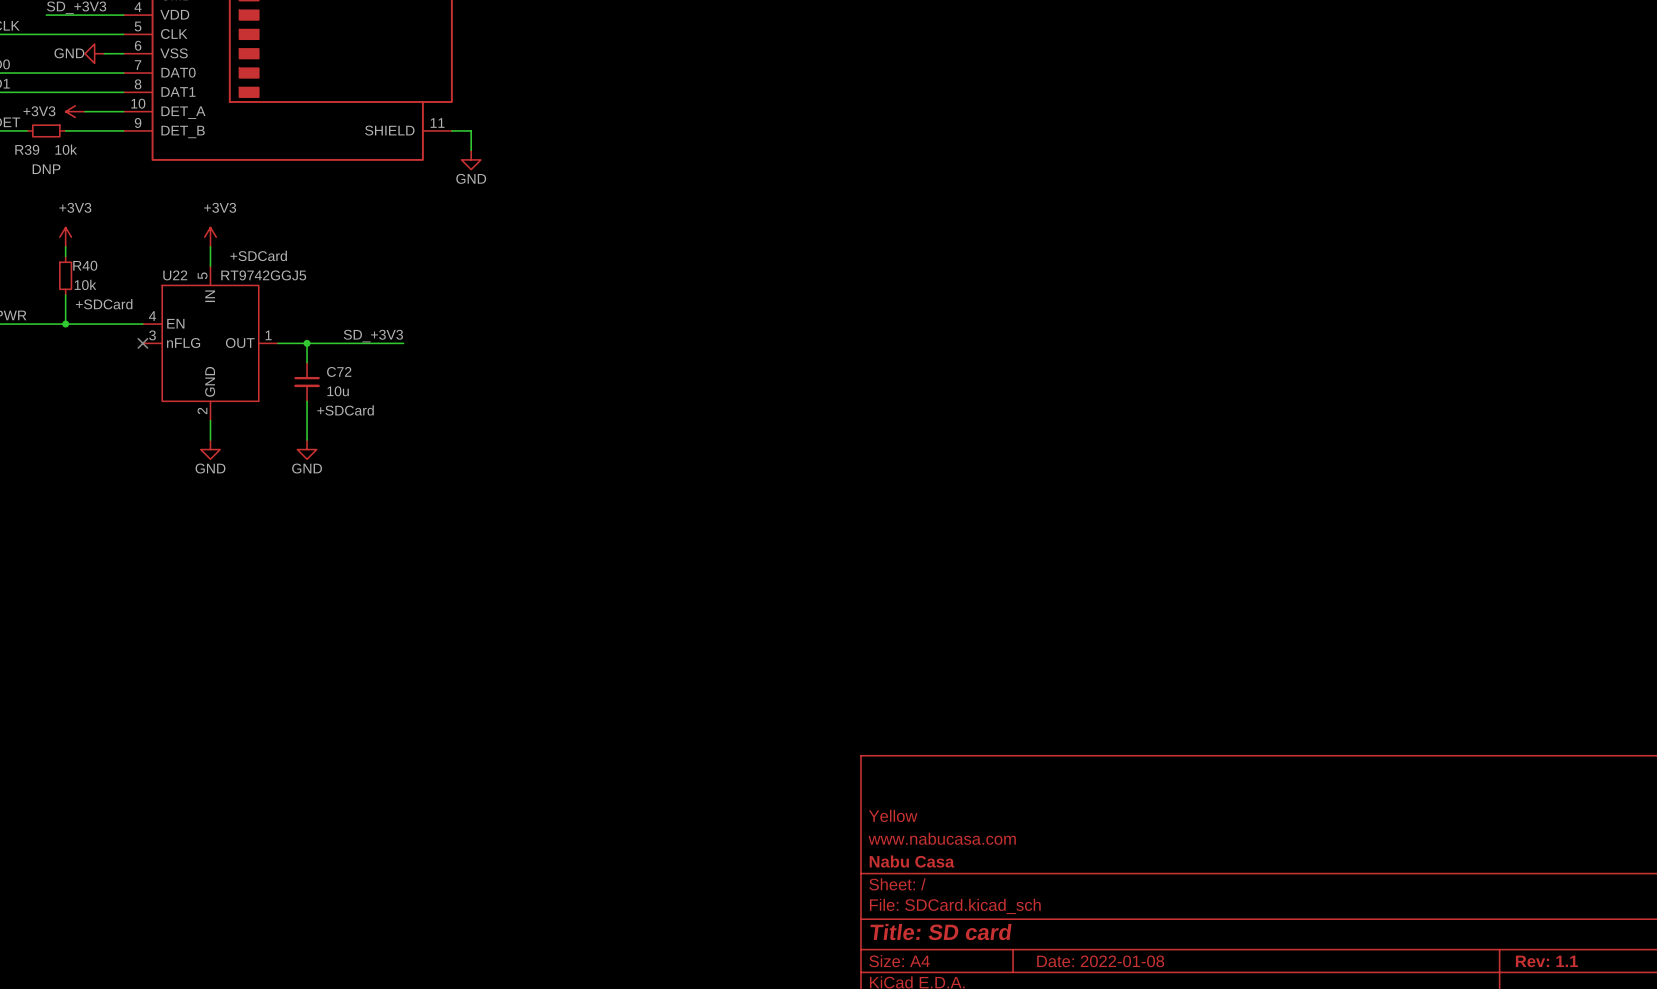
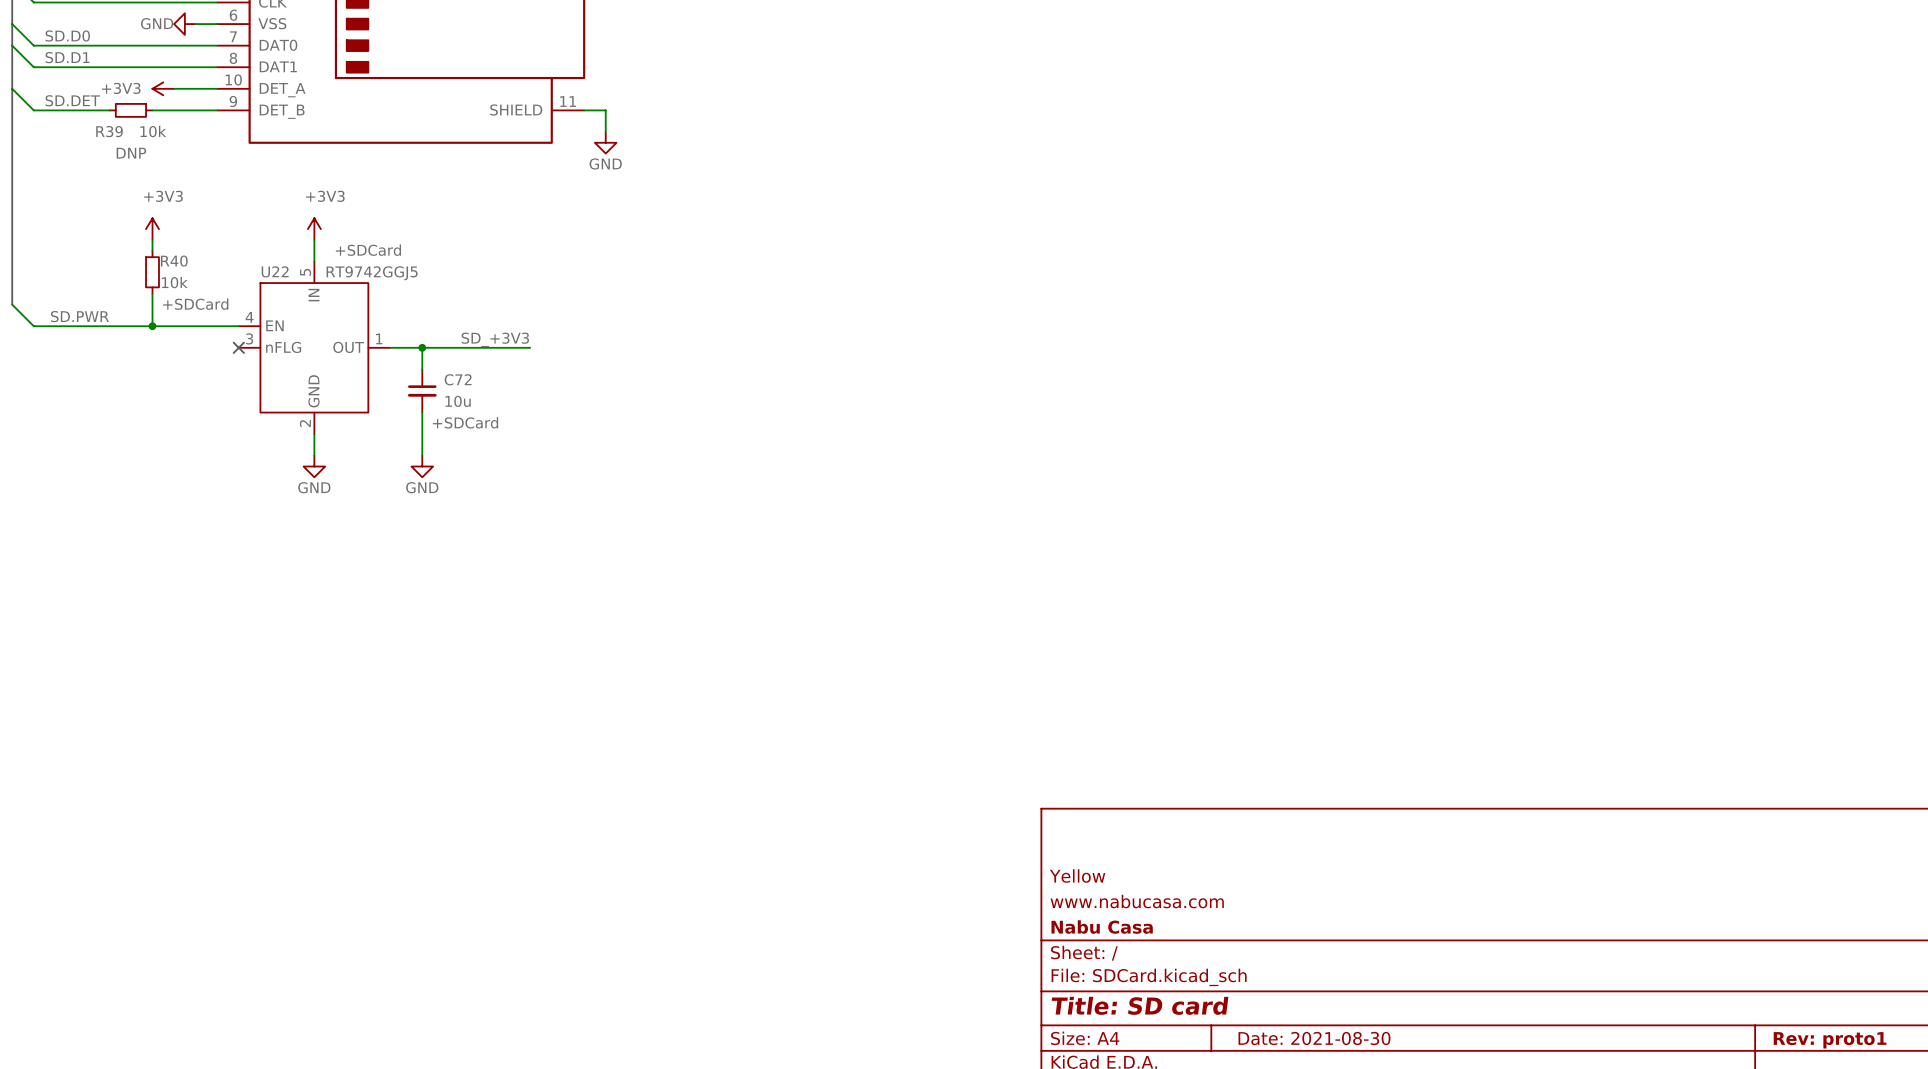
title block: Date: 2022-01-08 (1100, 961) -> Date: 2021-08-30 (1314, 1038)
title block: Rev: 1.1 (1546, 961) -> Rev: proto1 (1830, 1040)

